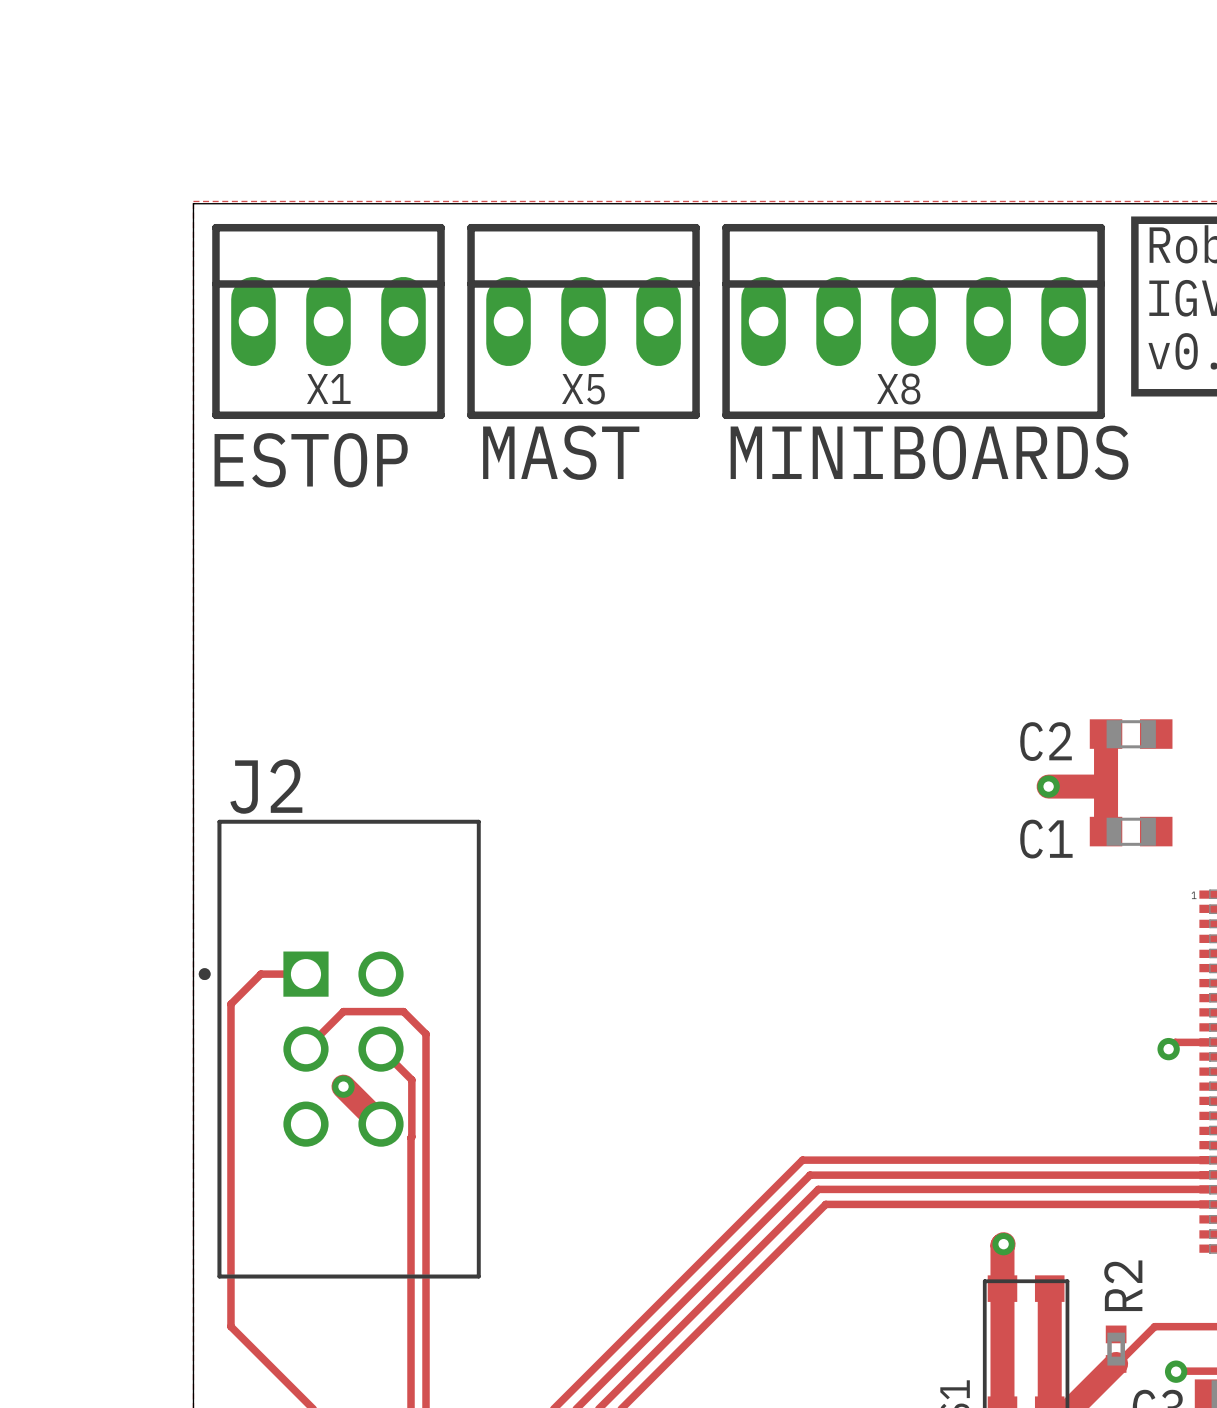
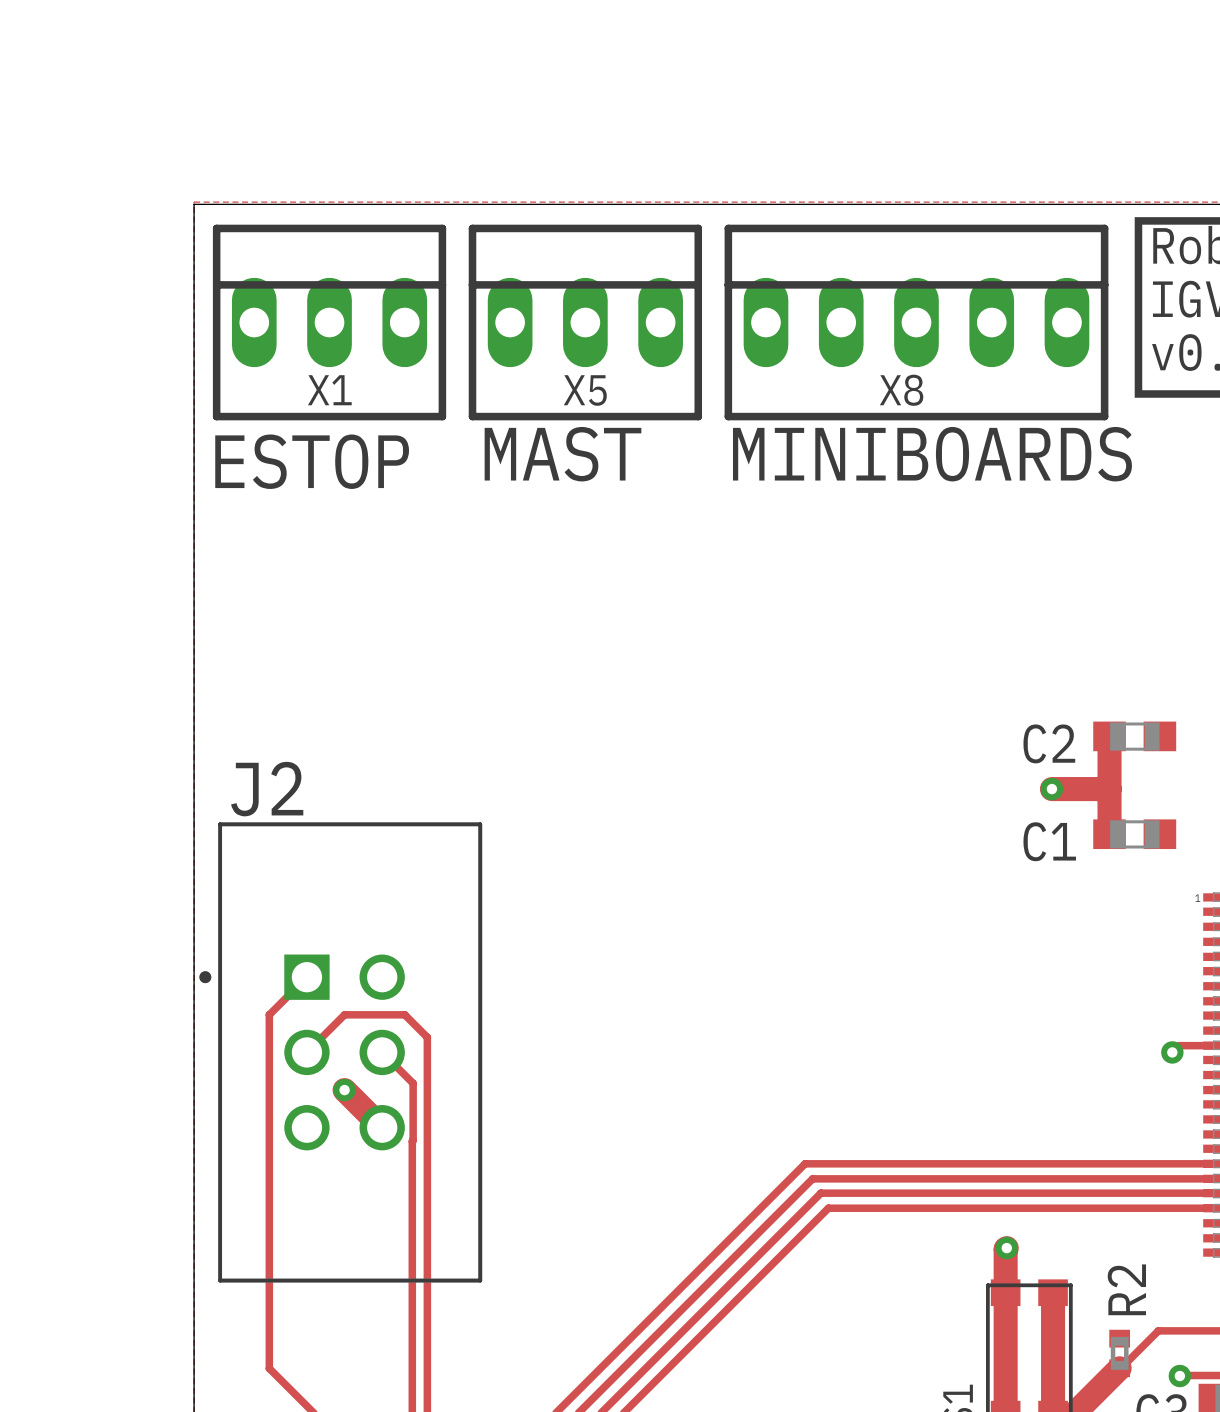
track: (305, 974) (260, 974) (230, 1004) (230, 1326) (268, 1364) -> (306, 977) (269, 1014) (269, 1368)

